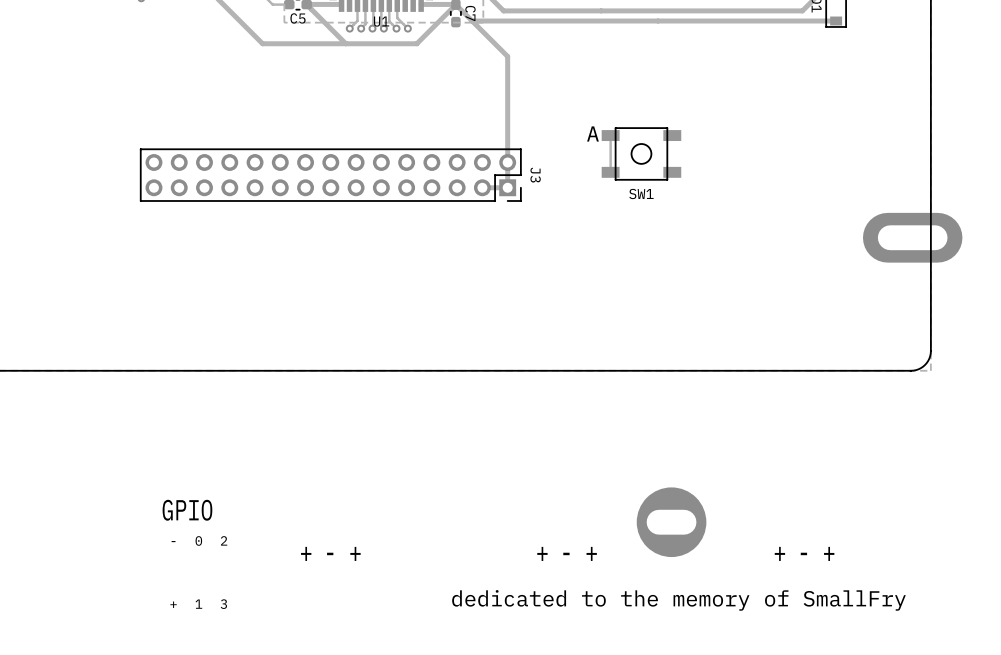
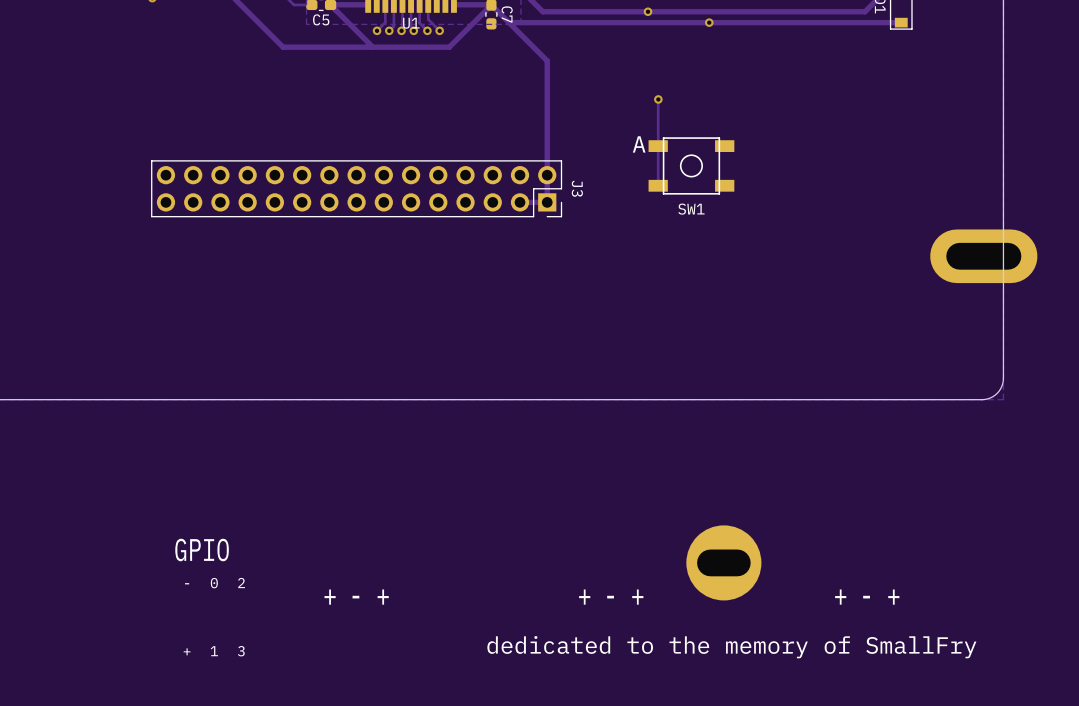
via: none -> (648, 11)
via: none -> (709, 22)
track: none -> (658, 99) (658, 146)
via: none -> (658, 99)

